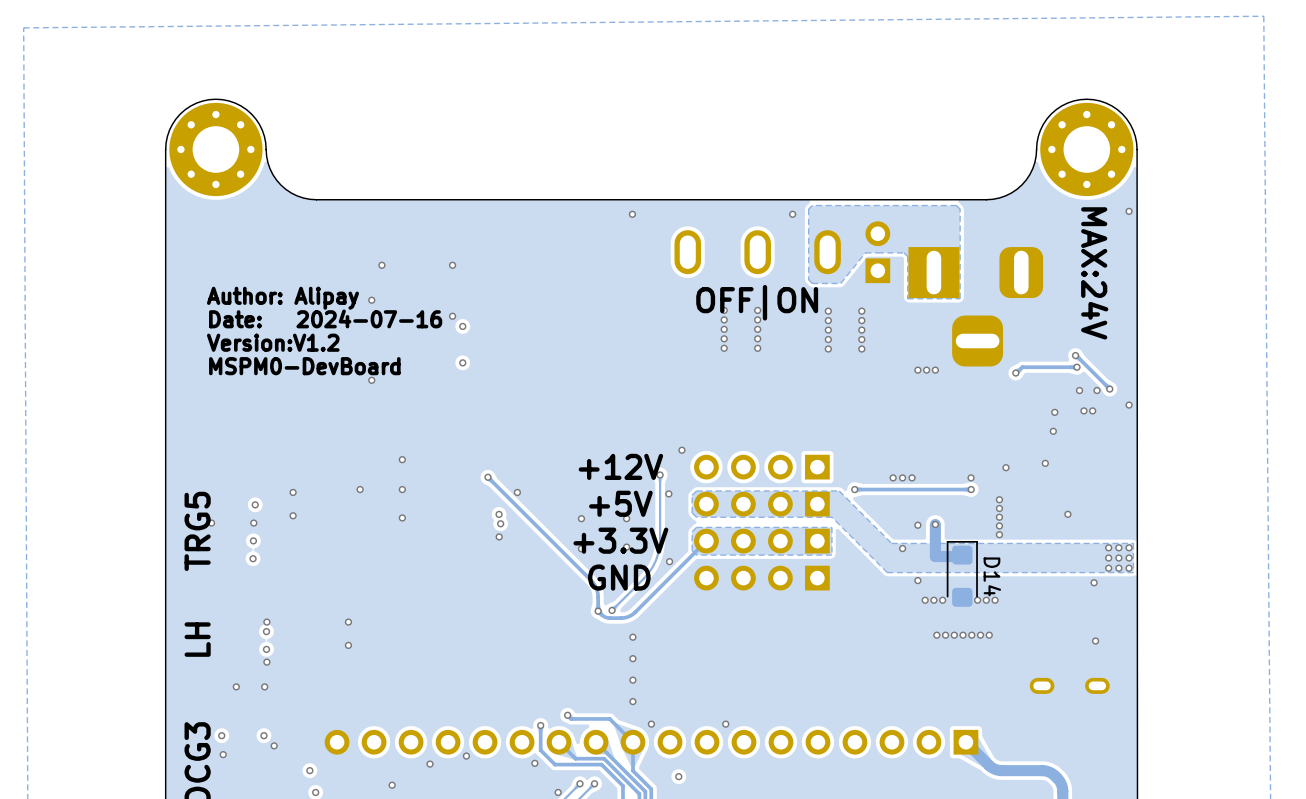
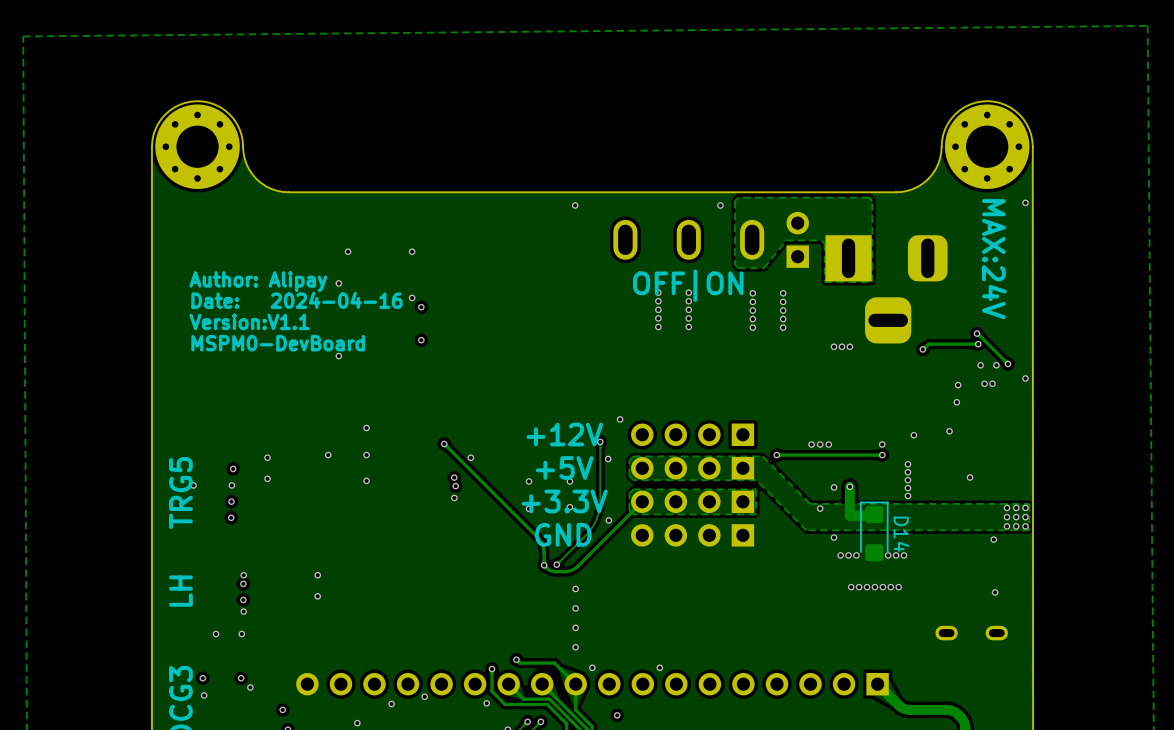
text: Date: 2024-07-16 (325, 318) -> Date: 2024-04-16 (297, 300)
text: Version:V1.2 (273, 342) -> Version:V1.1 (249, 321)

